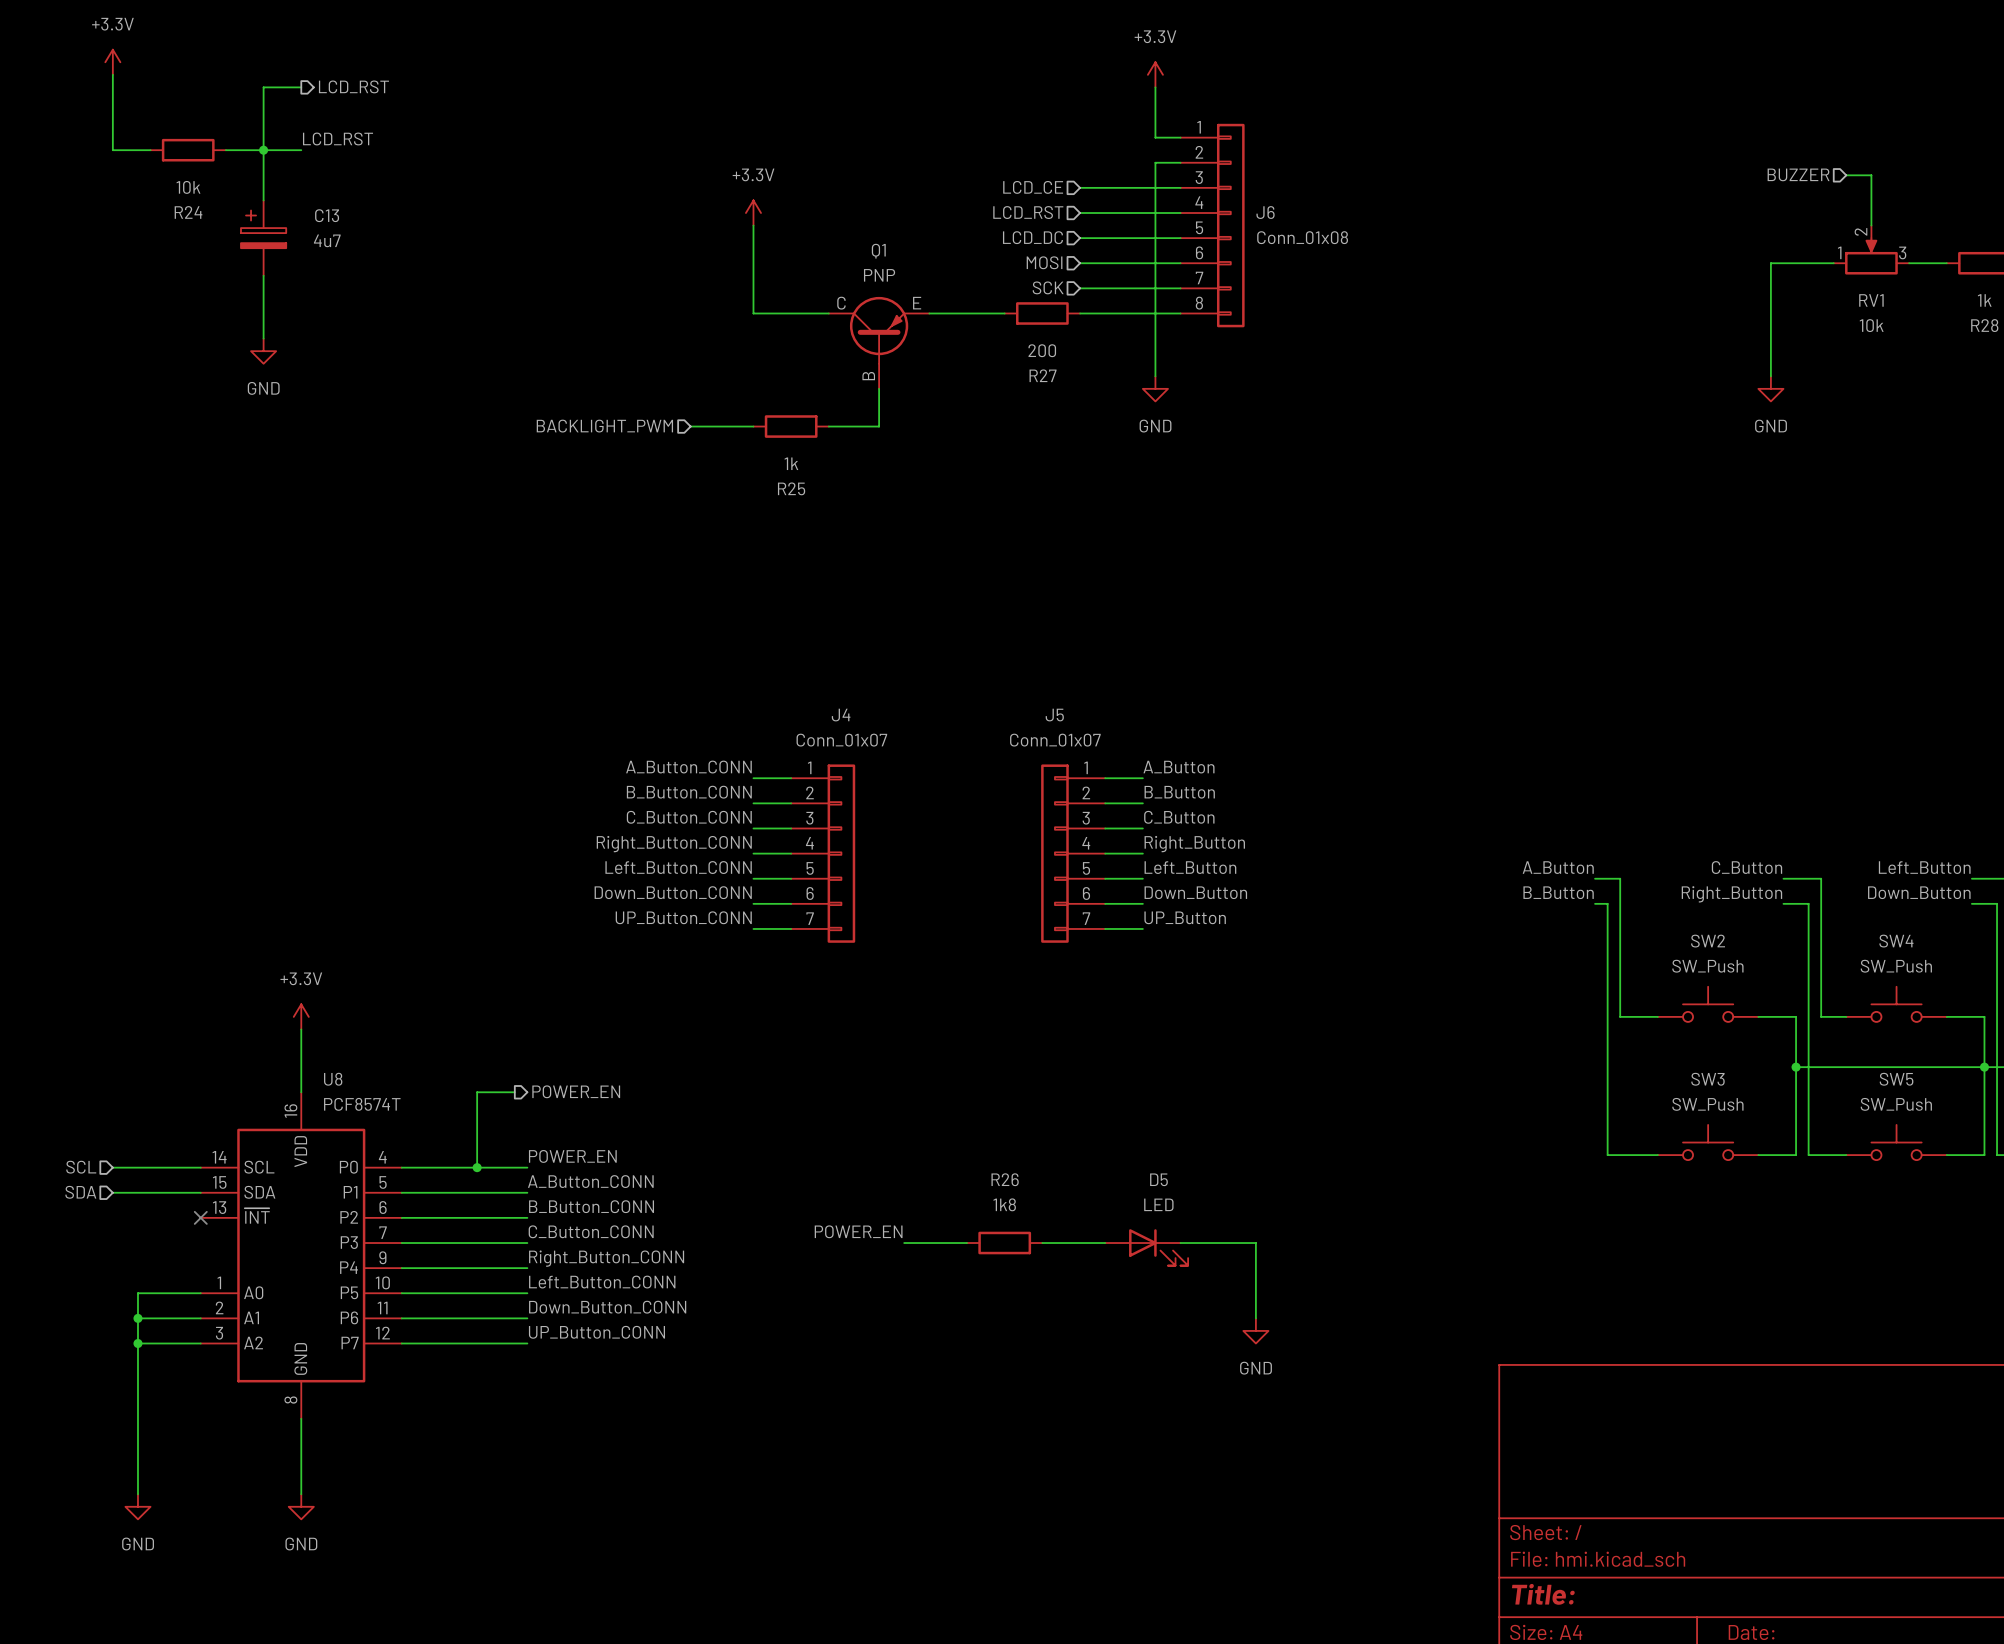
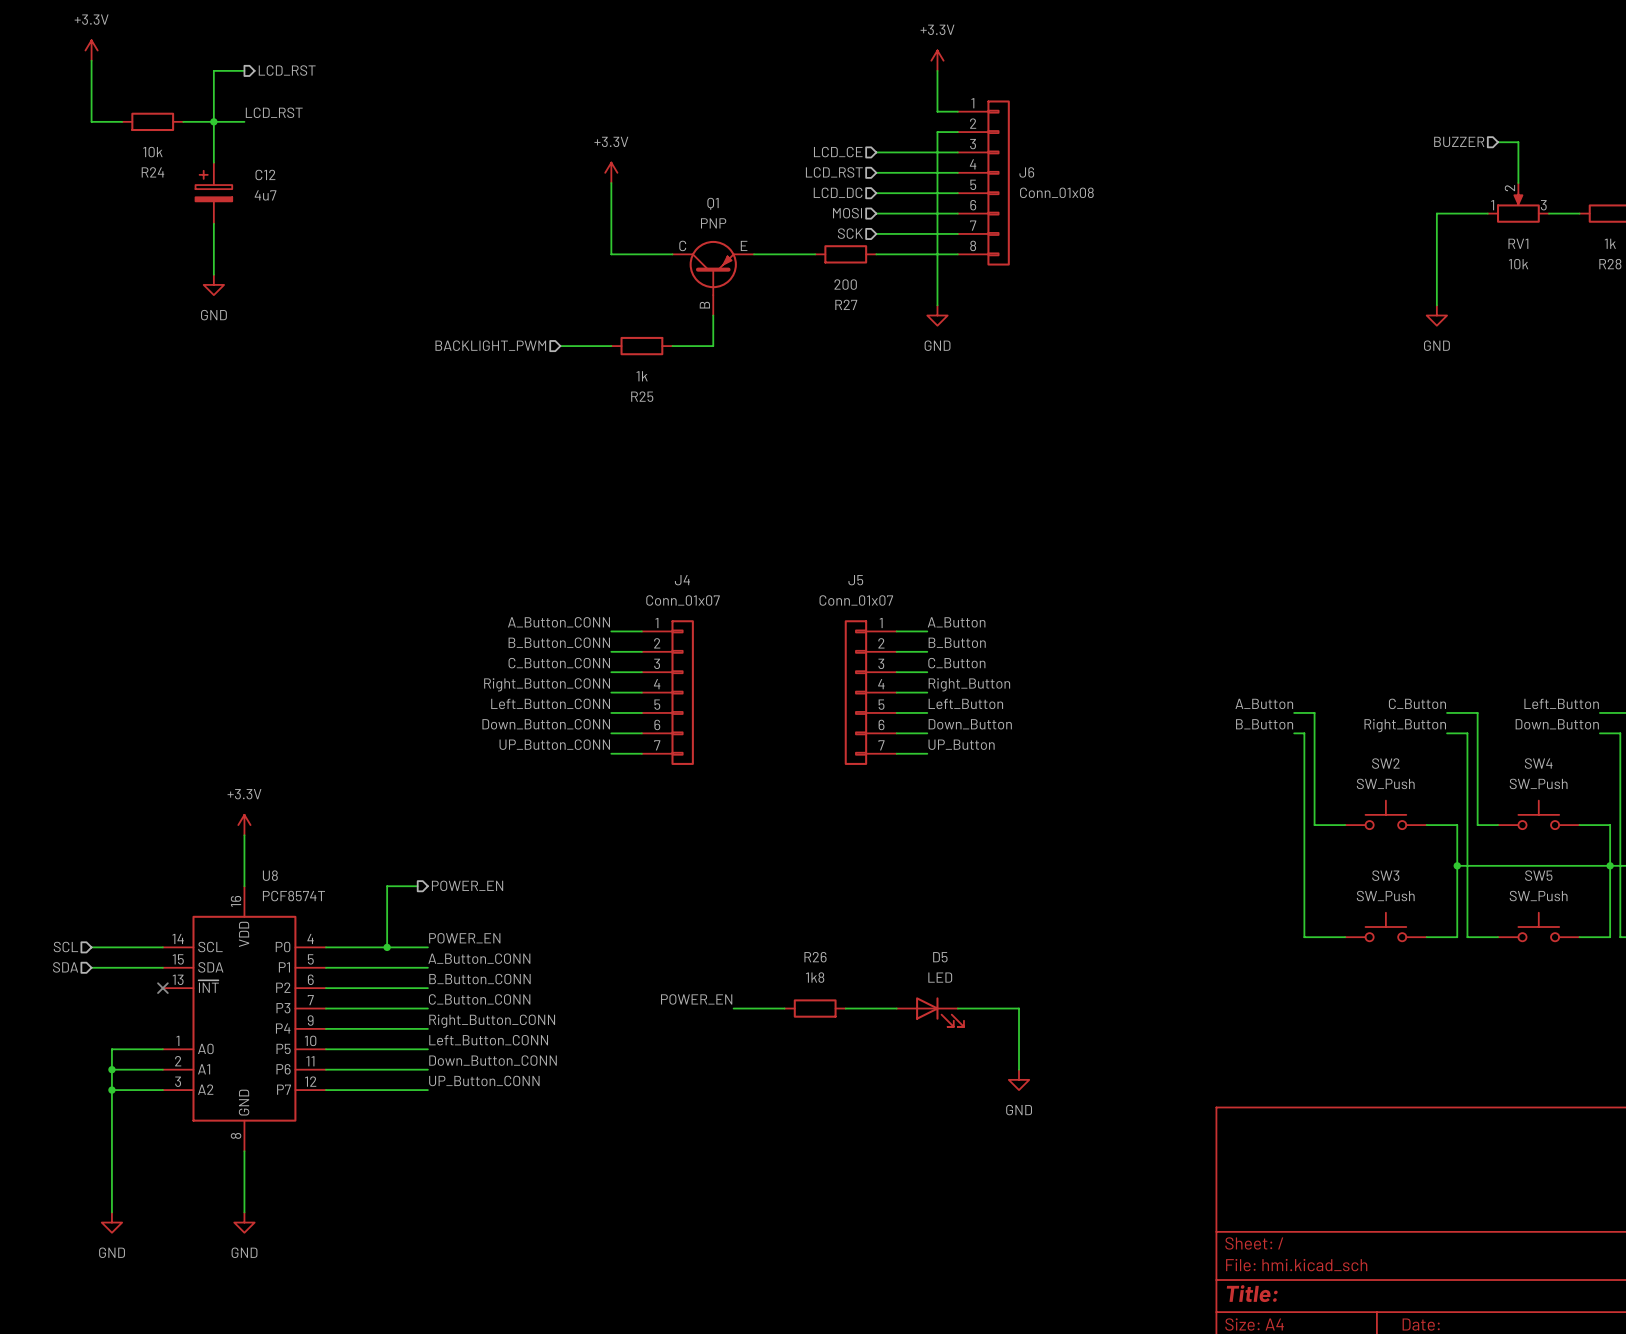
C13 name: C13 (327, 215) -> C12 (265, 174)

